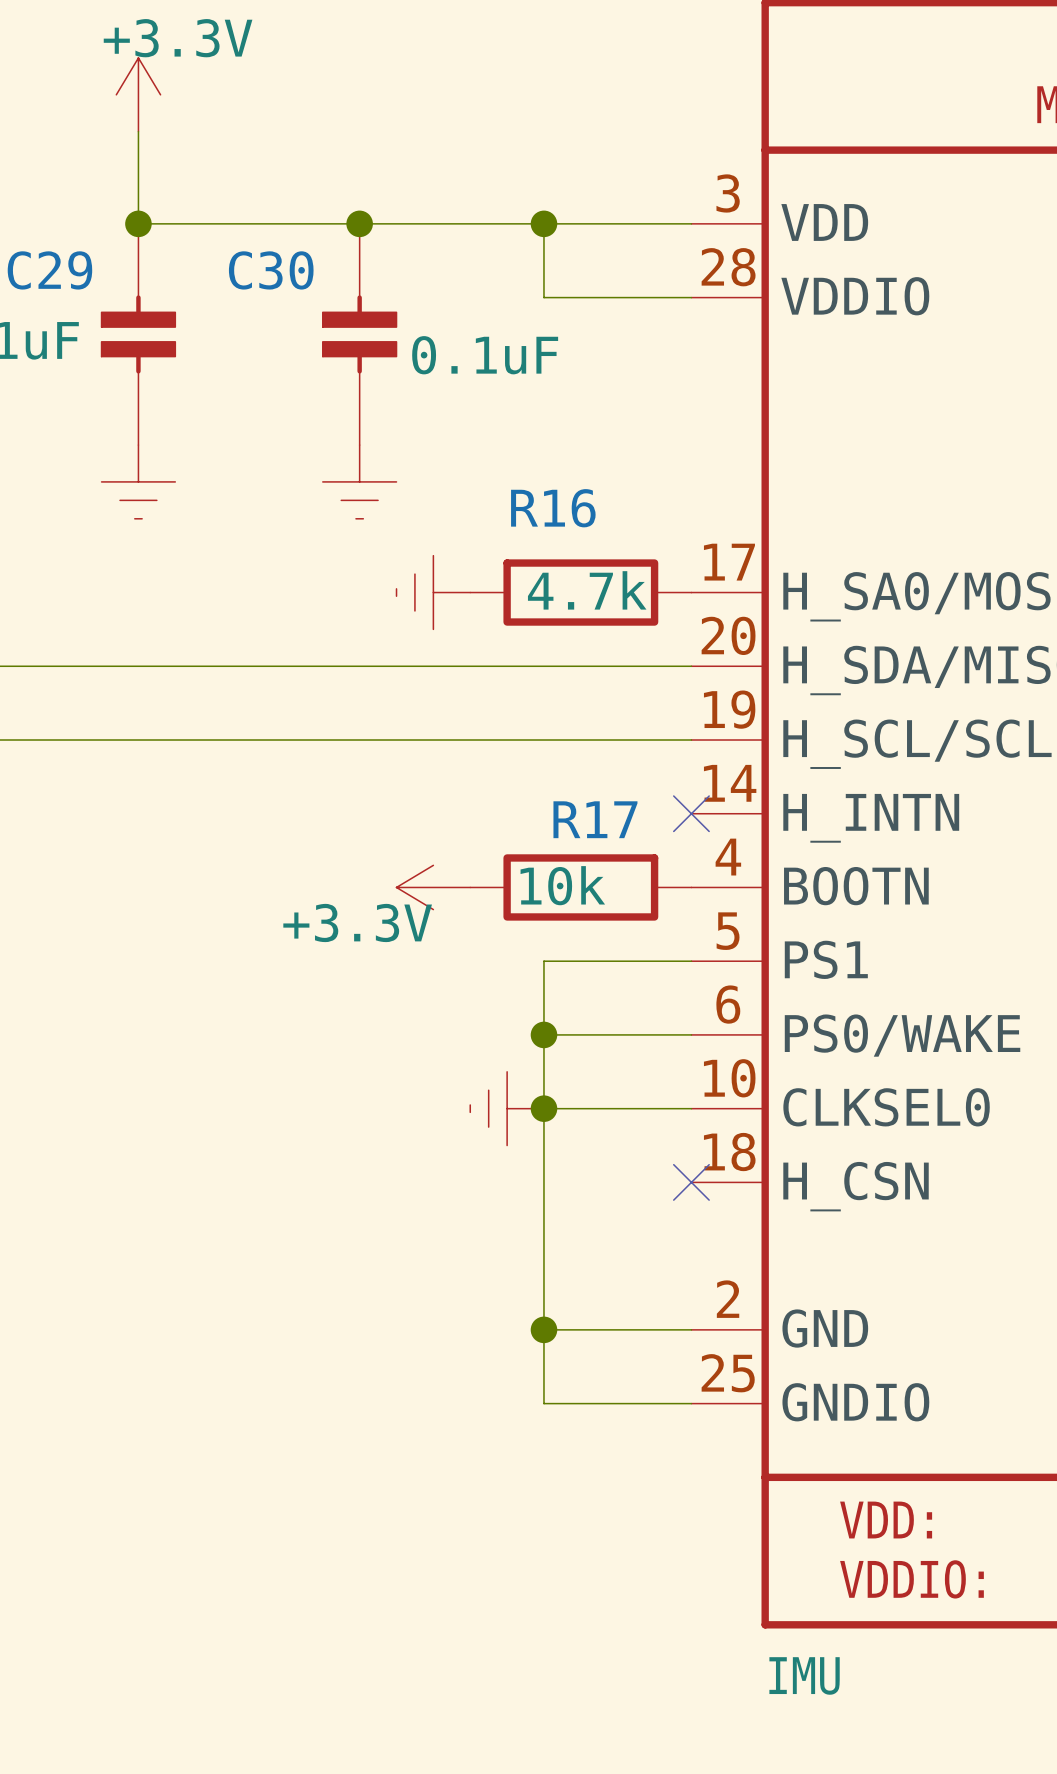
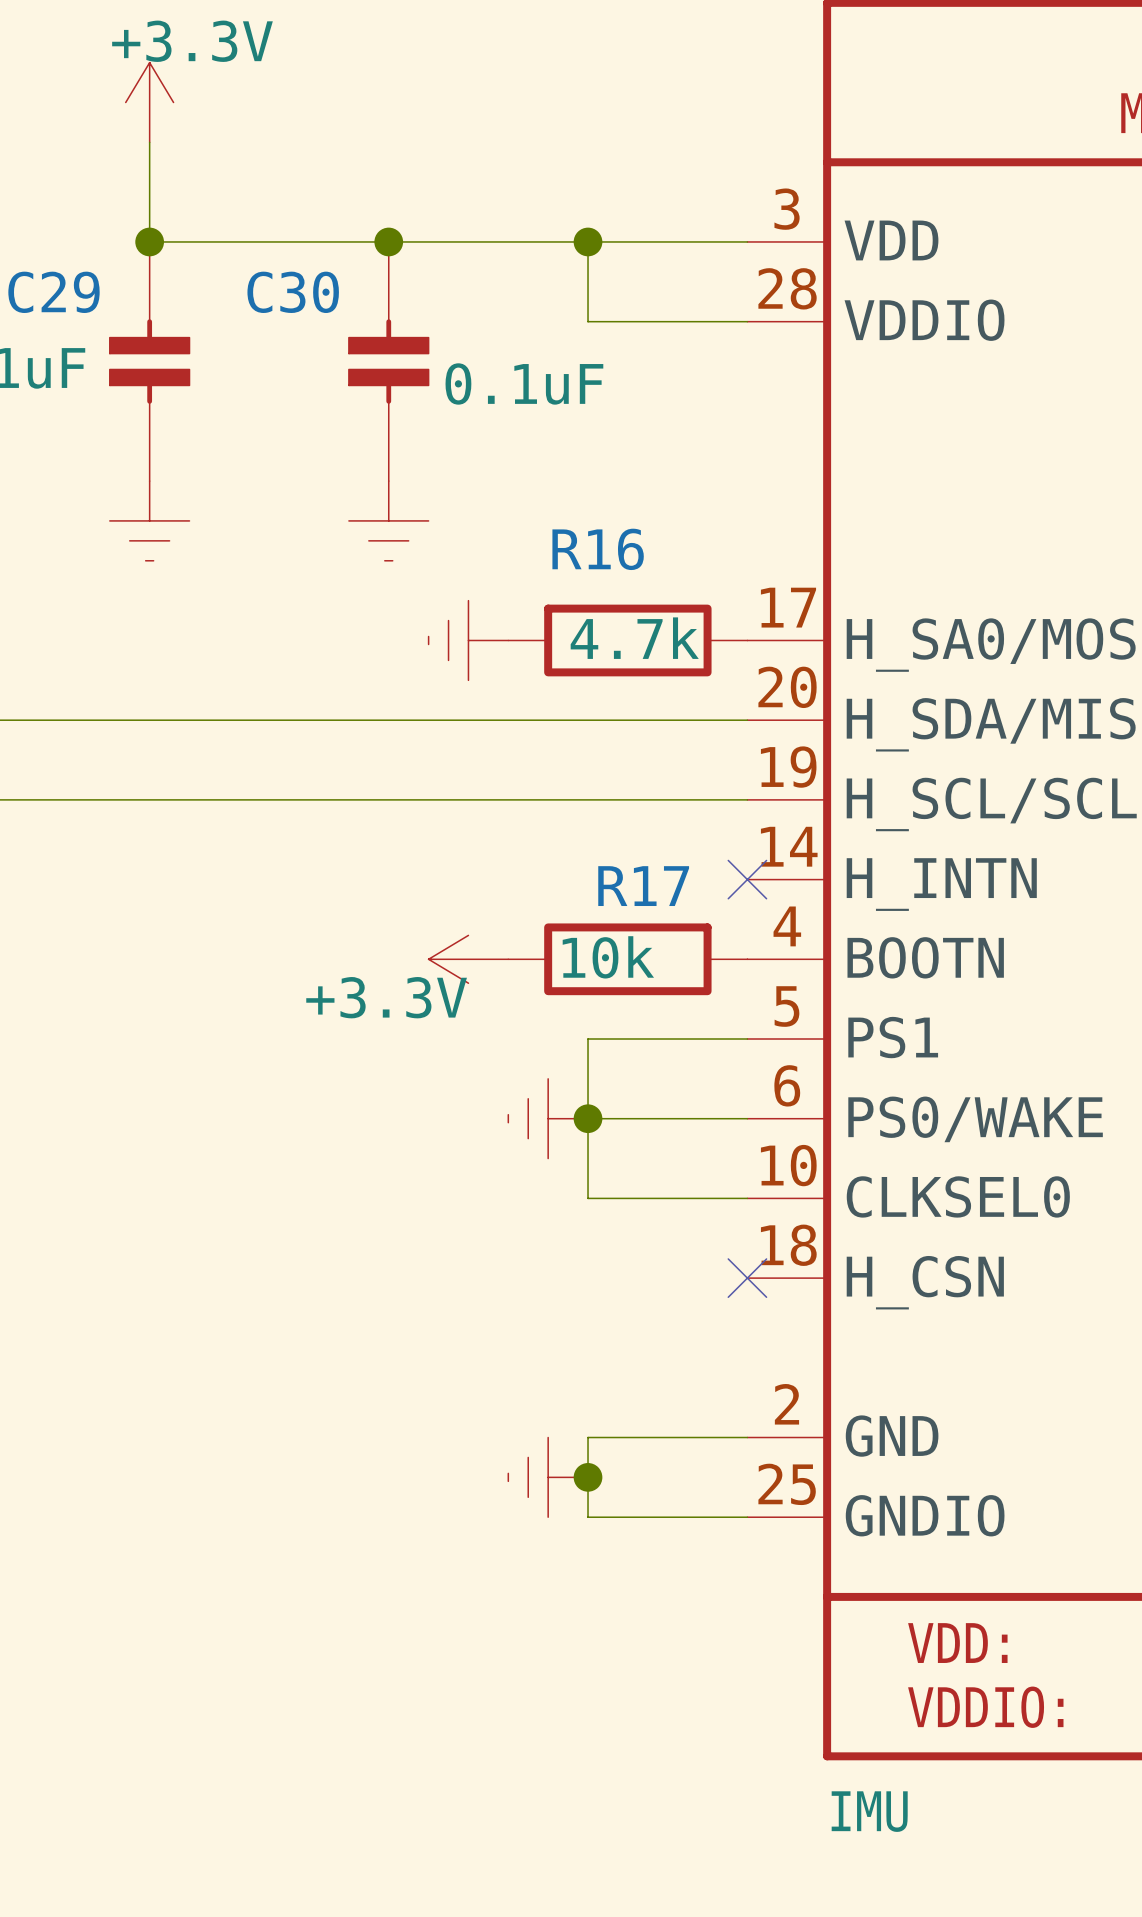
power symbol position: (507, 1108) -> (548, 1118)
wire: (543, 1108) (543, 1329) -> none
junction: (543, 1108) -> none
junction position: (543, 1329) -> (588, 1477)
power symbol: none -> (548, 1477)

